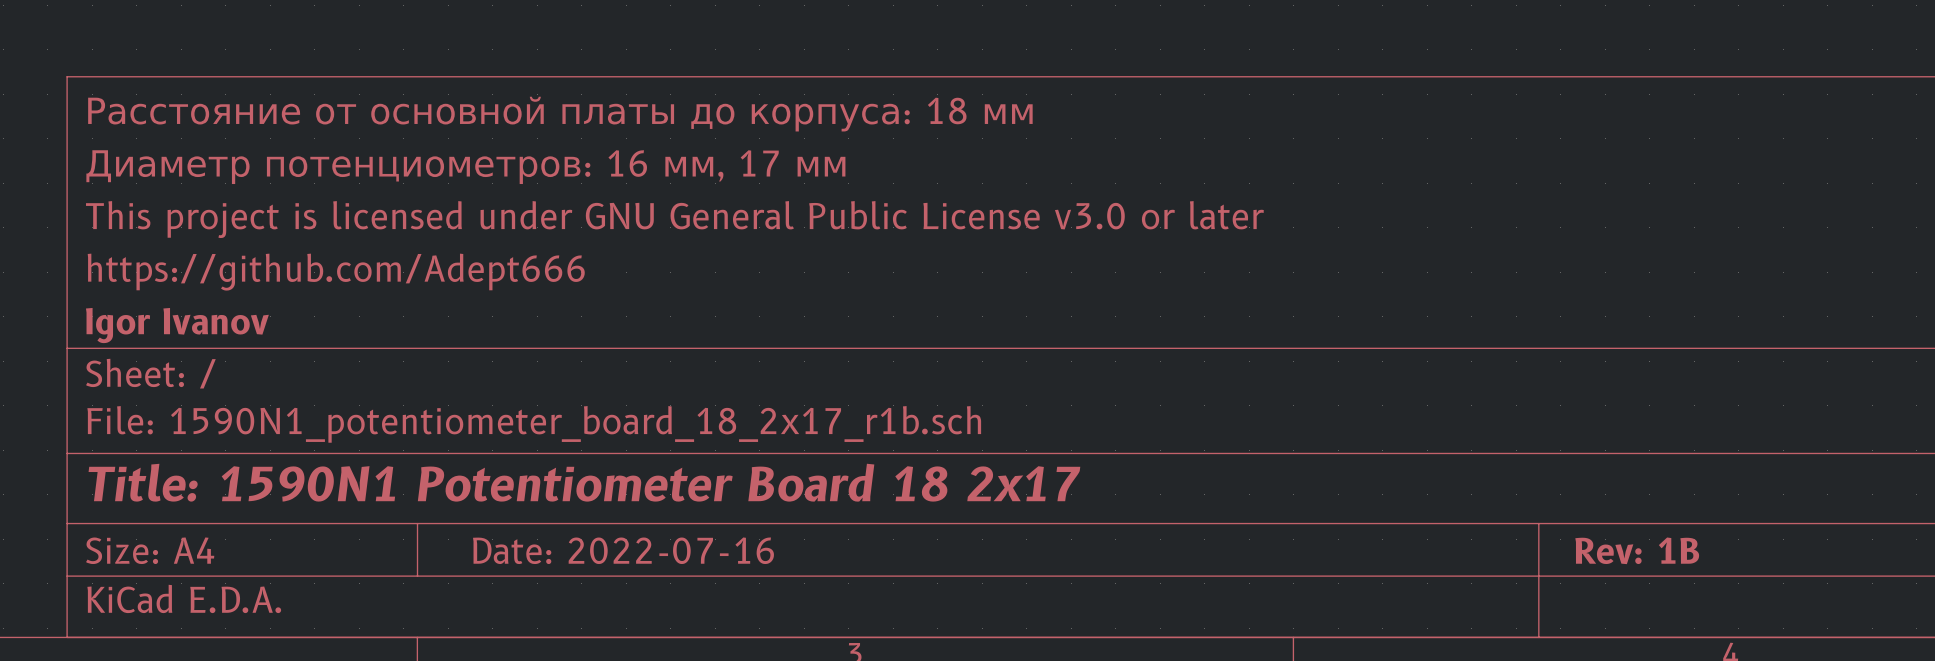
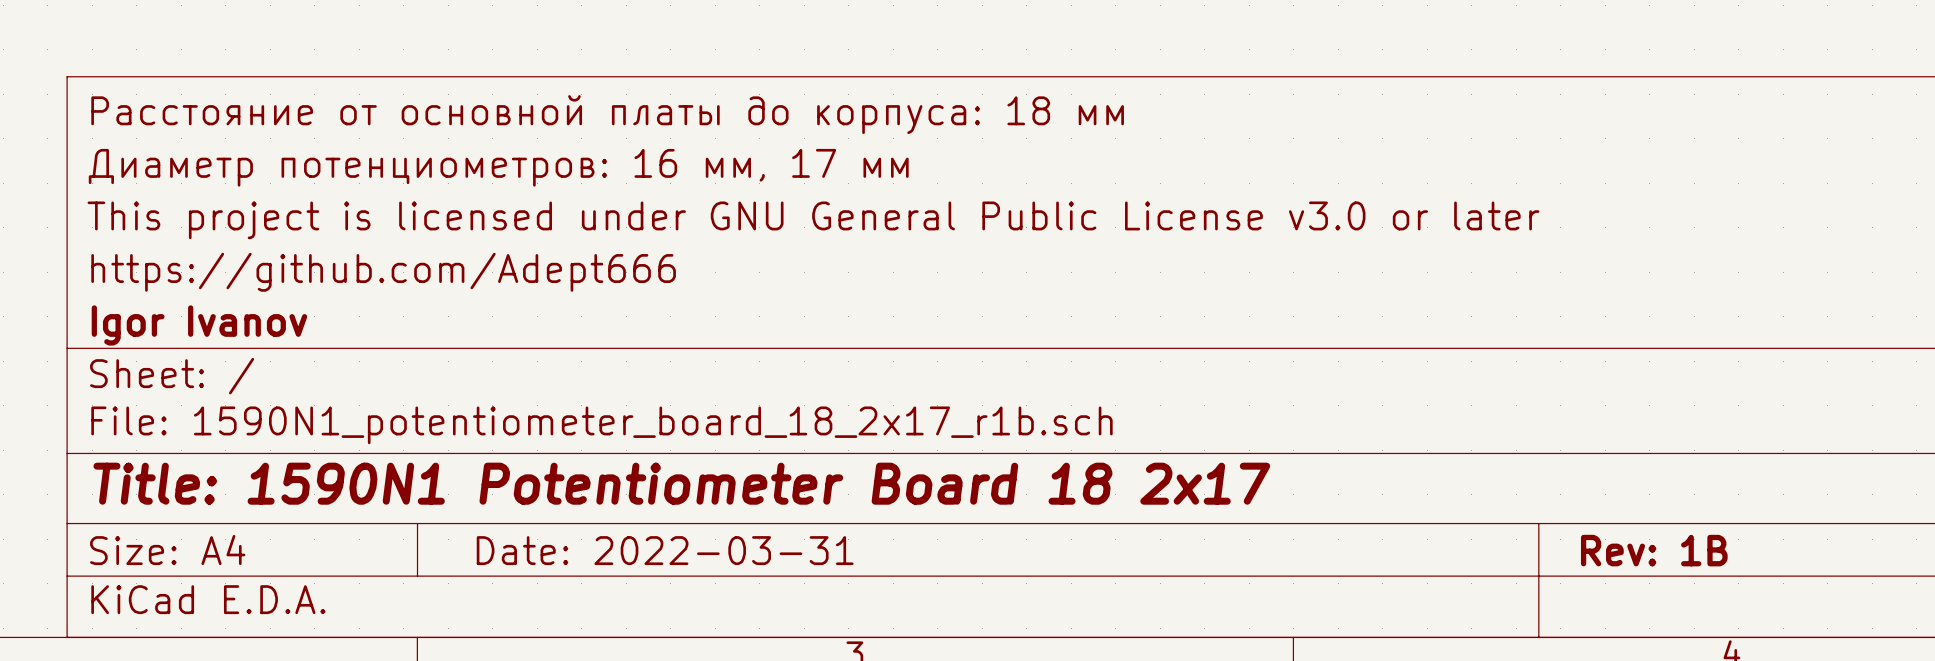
title block: Date: 2022-07-16 (623, 550) -> Date: 2022-03-31 (665, 550)

